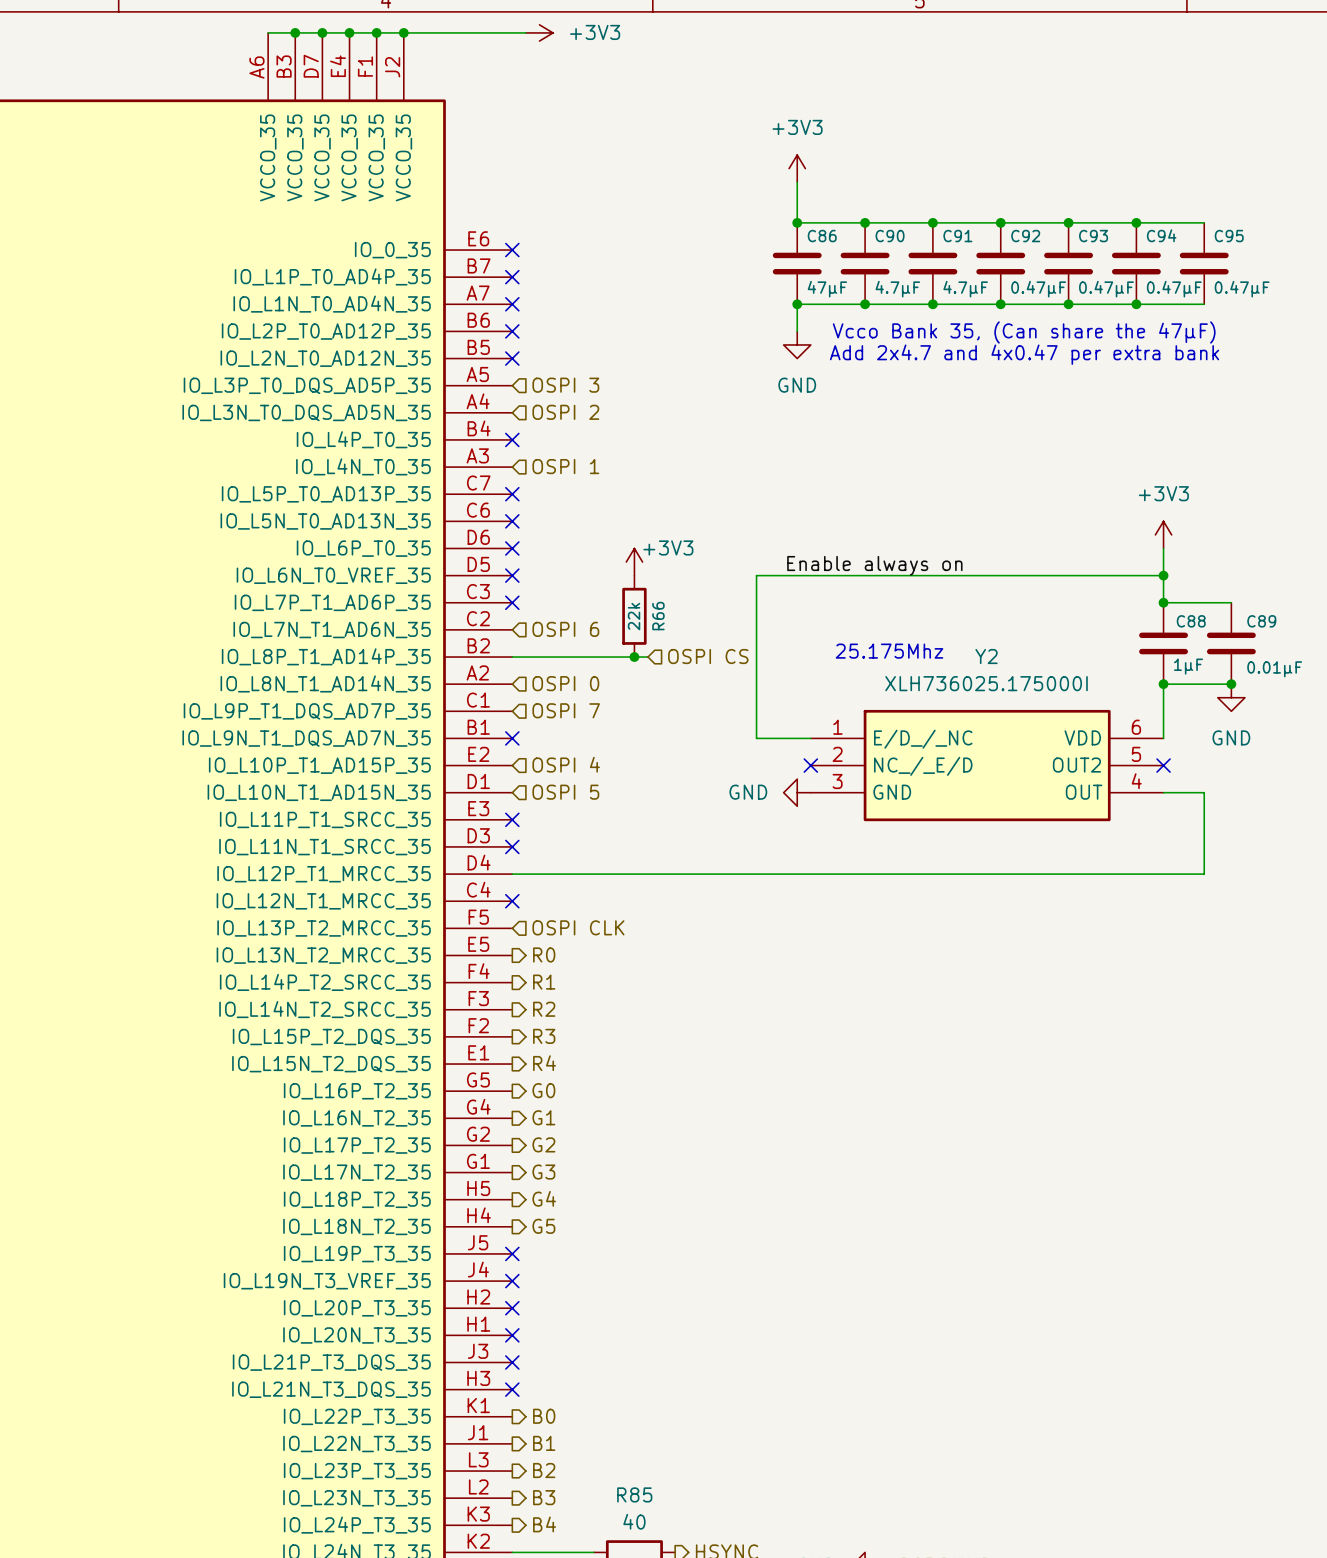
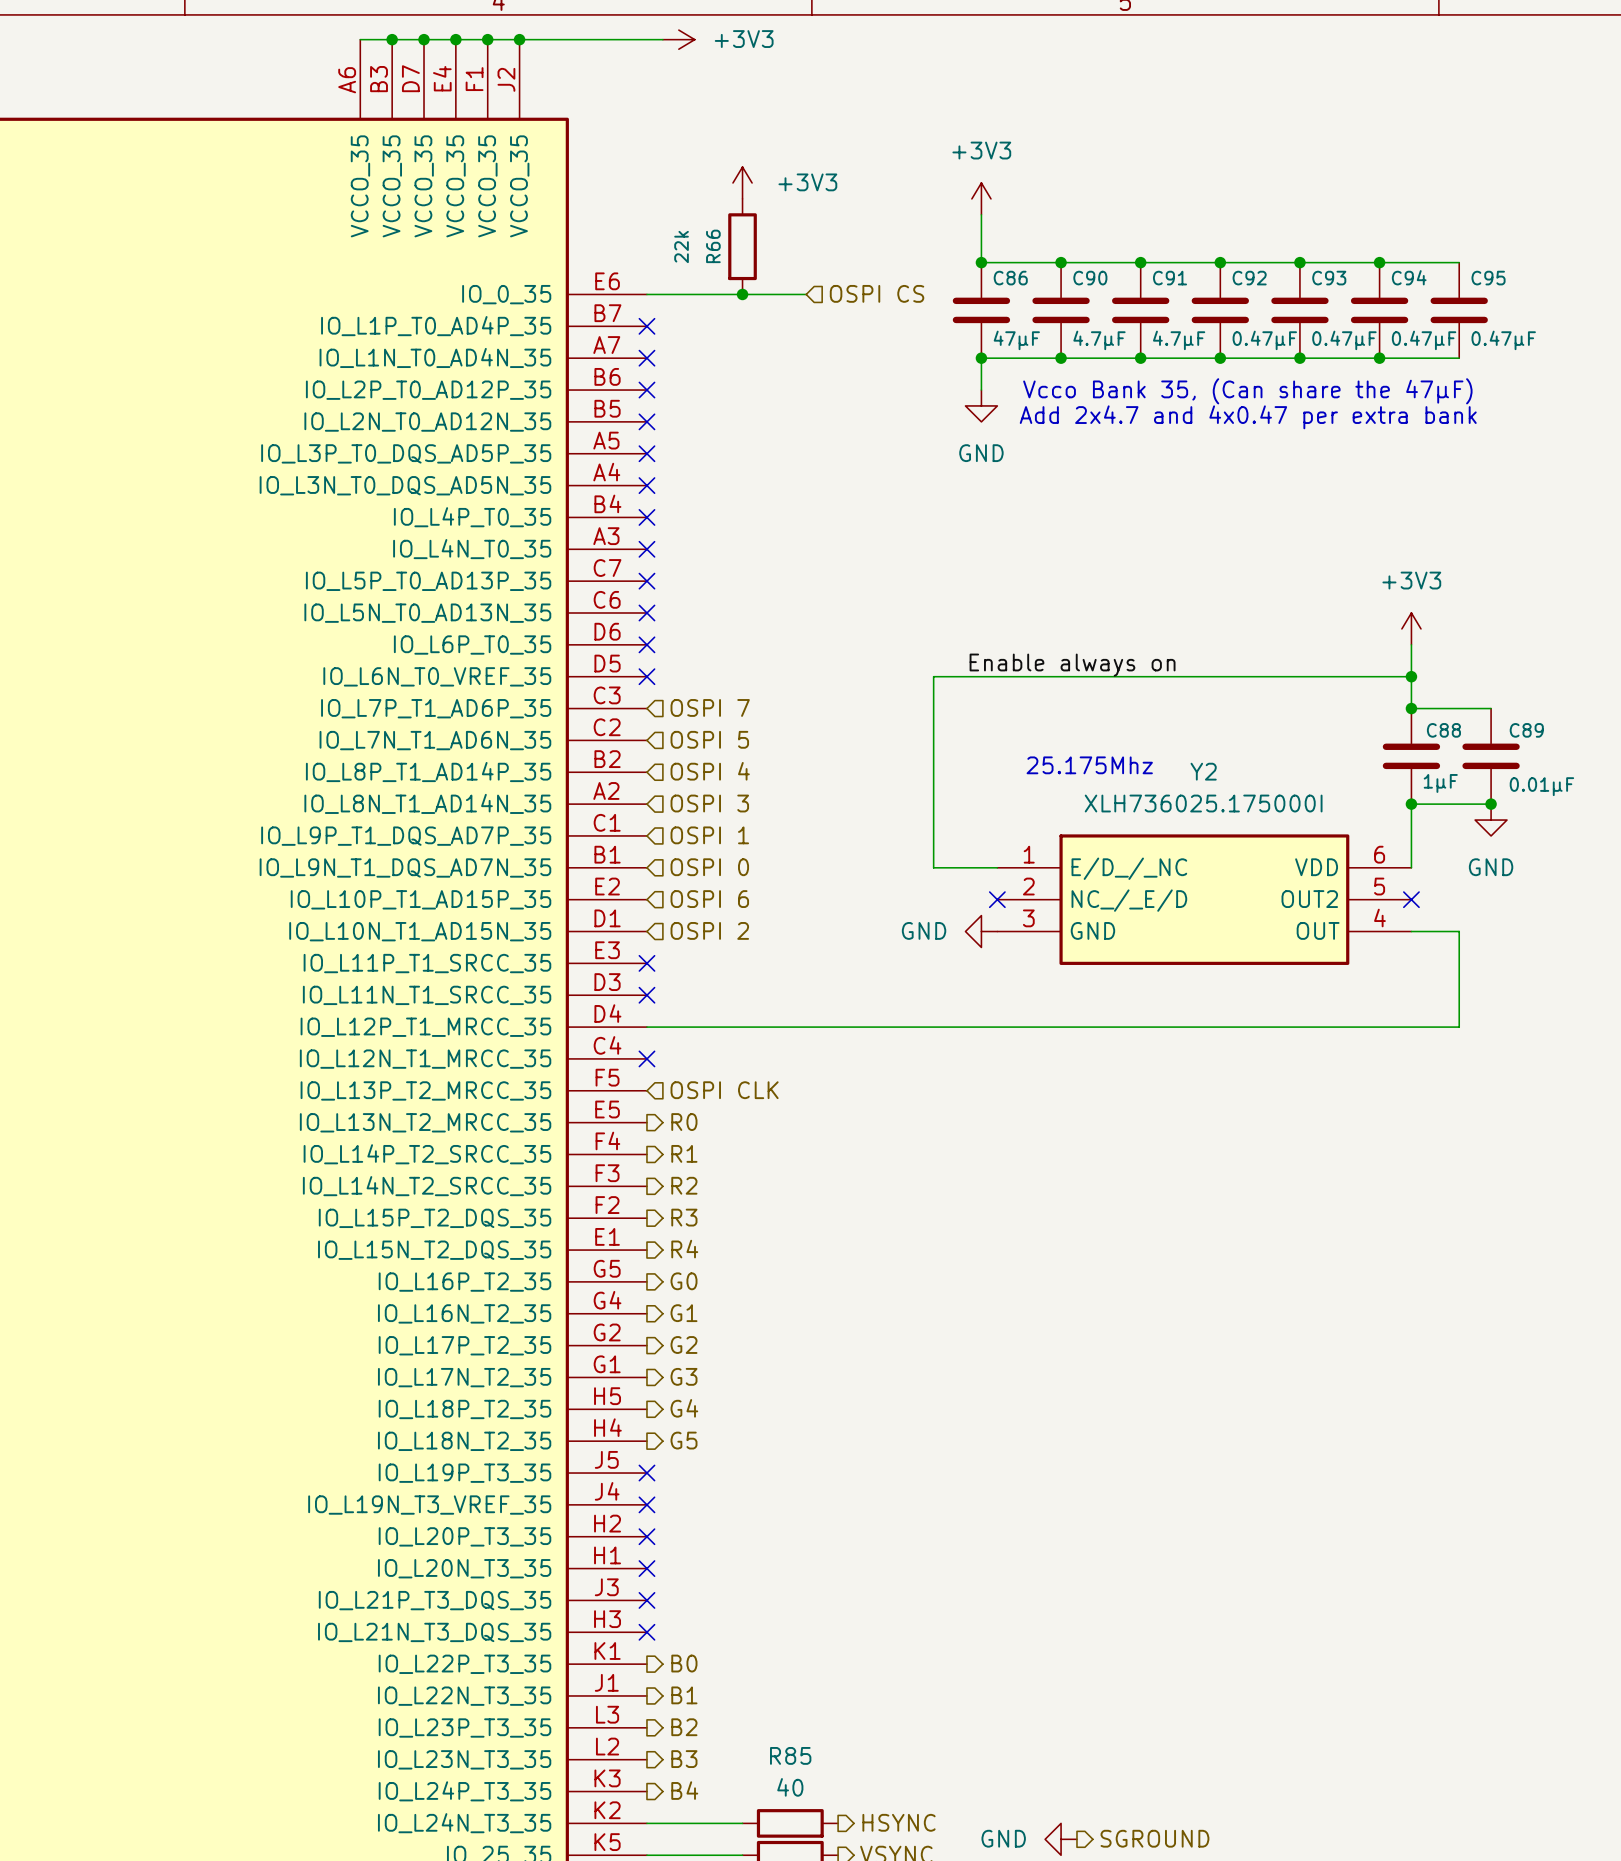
power symbol: none -> +3V3 (742, 182)
hierarchical label: none -> OSPI CS (877, 293)
wire: none -> (646, 294) (806, 294)
no-connect mark: (512, 250) -> none
junction: none -> (742, 294)
no-connect mark: none -> (646, 453)
hierarchical label: OSPI 3 (565, 385) -> none
no-connect mark: none -> (646, 485)
hierarchical label: OSPI 2 (565, 412) -> none
hierarchical label: OSPI 1 (565, 466) -> none
no-connect mark: none -> (646, 549)
power symbol: +3V3 (634, 562) -> none
no-connect mark: (512, 602) -> none
hierarchical label: none -> OSPI 7 (710, 707)
R66 position: (634, 616) -> (742, 246)
R66 value position: 22k (634, 616) -> 22k (681, 246)
R66 name position: R66 (658, 616) -> R66 (713, 246)
hierarchical label: OSPI 6 (565, 629) -> OSPI 5 (709, 739)
hierarchical label: none -> OSPI 4 (710, 771)
hierarchical label: OSPI CS (708, 656) -> none
wire: (512, 657) (648, 657) -> none
junction: (634, 657) -> none
hierarchical label: OSPI 0 (565, 683) -> OSPI 3 (709, 803)
hierarchical label: OSPI 7 (566, 710) -> OSPI 1 (709, 835)
hierarchical label: none -> OSPI 0 (709, 867)
no-connect mark: (512, 738) -> none
hierarchical label: OSPI 4 (566, 764) -> OSPI 6 (709, 899)
hierarchical label: OSPI 5 (565, 792) -> OSPI 2 (709, 930)

